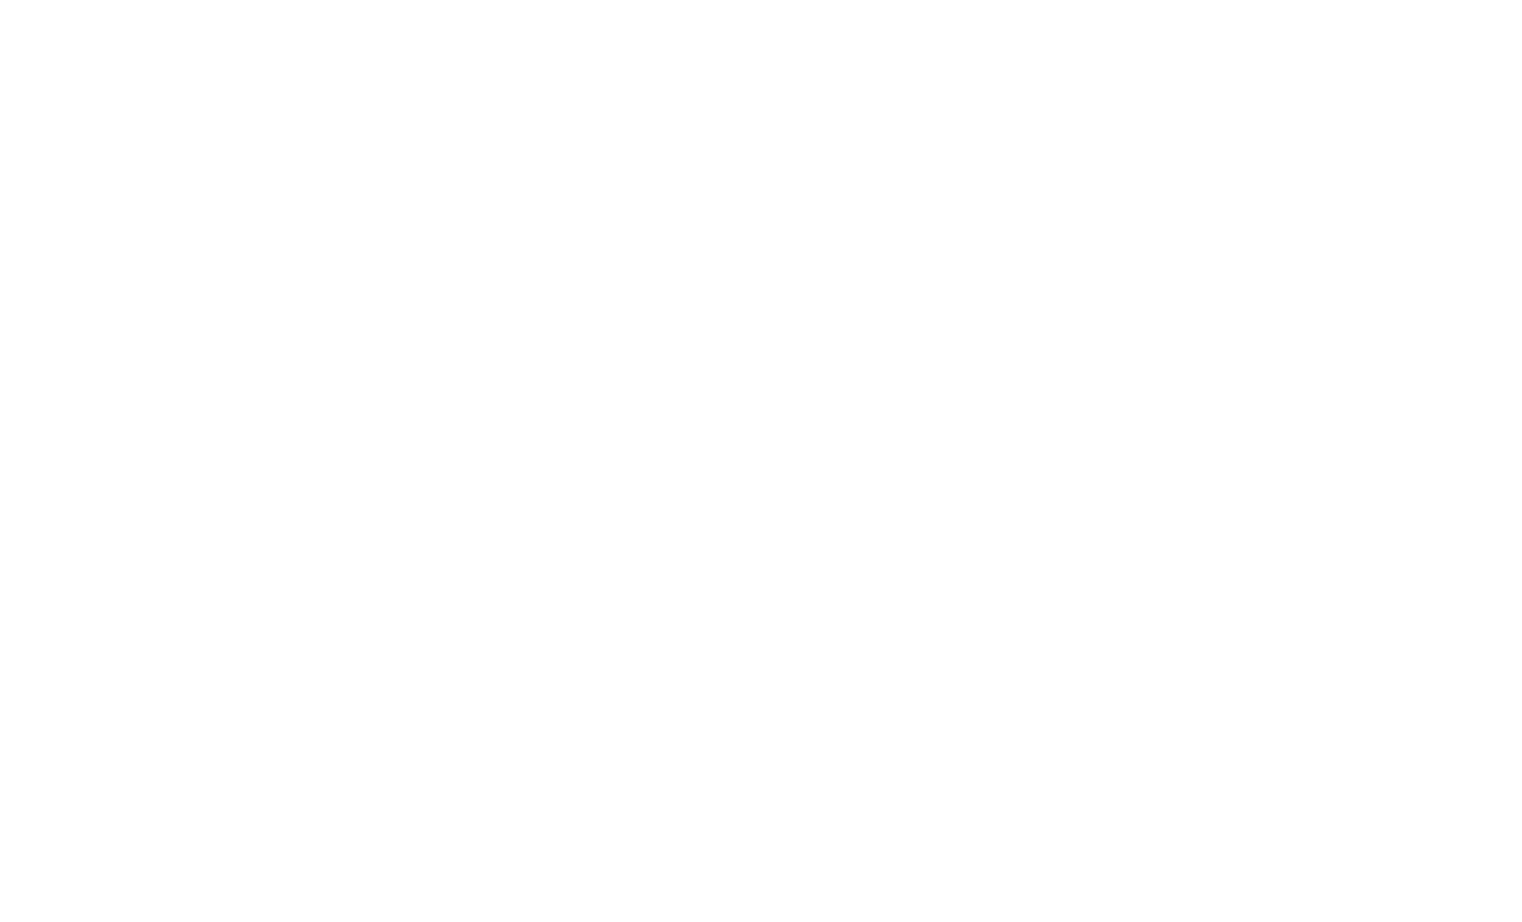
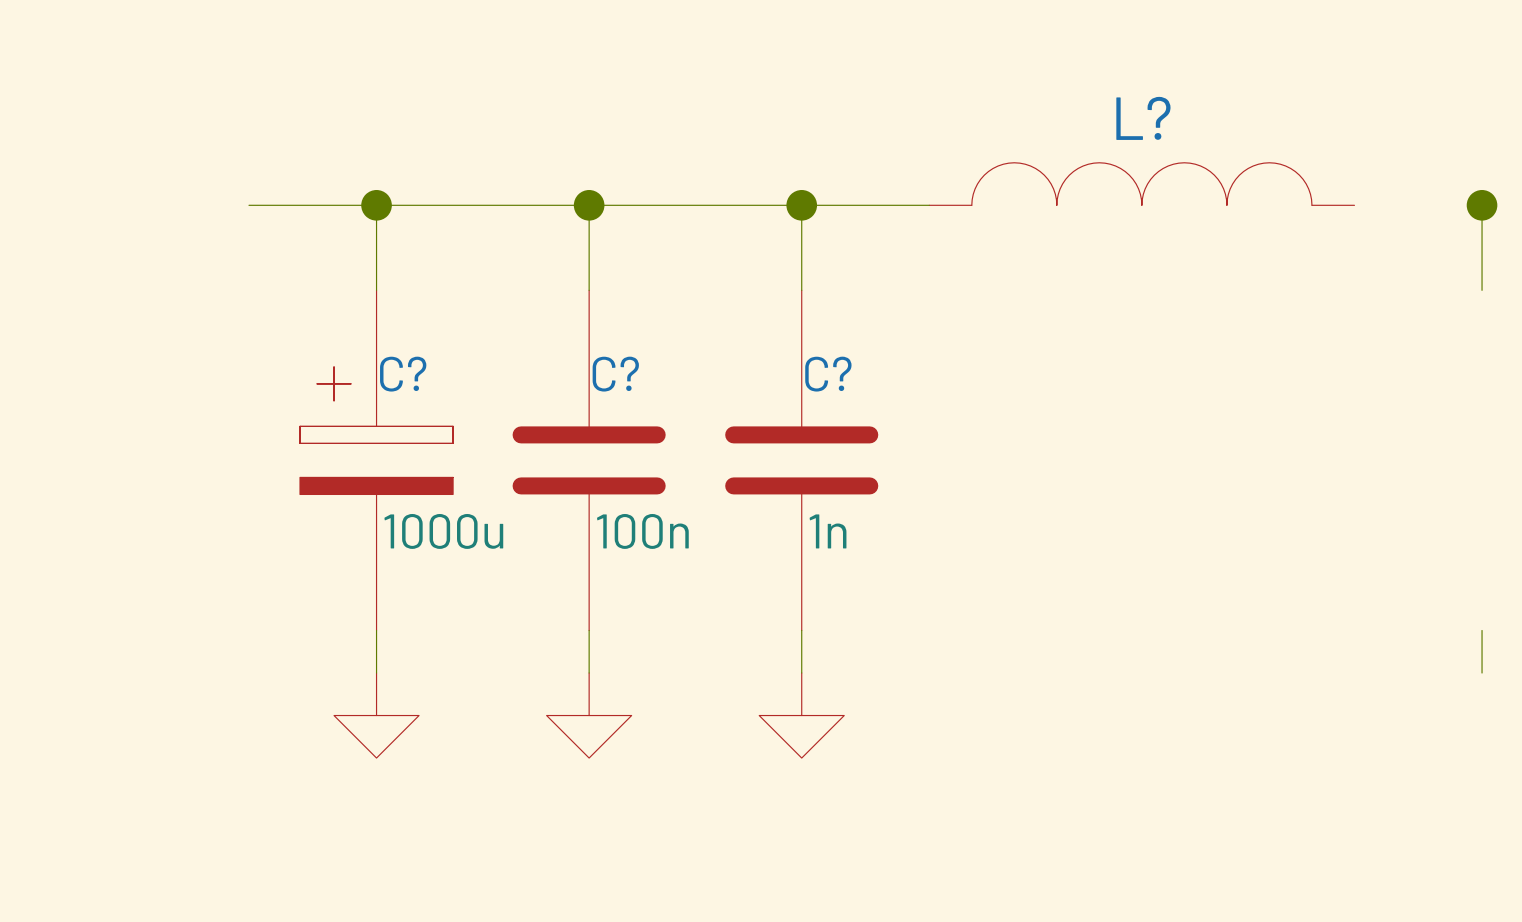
L?: none -> (1141, 184)
wire: none -> (248, 205) (929, 205)
wire: none -> (376, 205) (376, 290)
junction: none -> (376, 205)
wire: none -> (589, 205) (589, 290)
junction: none -> (589, 205)
wire: none -> (801, 205) (801, 290)
junction: none -> (801, 205)
wire: none -> (1482, 205) (1482, 290)
junction: none -> (1482, 205)
C?: none -> 1000u (376, 460)
C?: none -> 100n (589, 460)
C?: none -> 1n (801, 460)
wire: none -> (376, 630) (376, 673)
wire: none -> (589, 630) (589, 673)
wire: none -> (801, 630) (801, 673)
wire: none -> (1482, 630) (1482, 673)
power symbol: none -> (376, 715)
power symbol: none -> (589, 715)
power symbol: none -> (801, 715)

